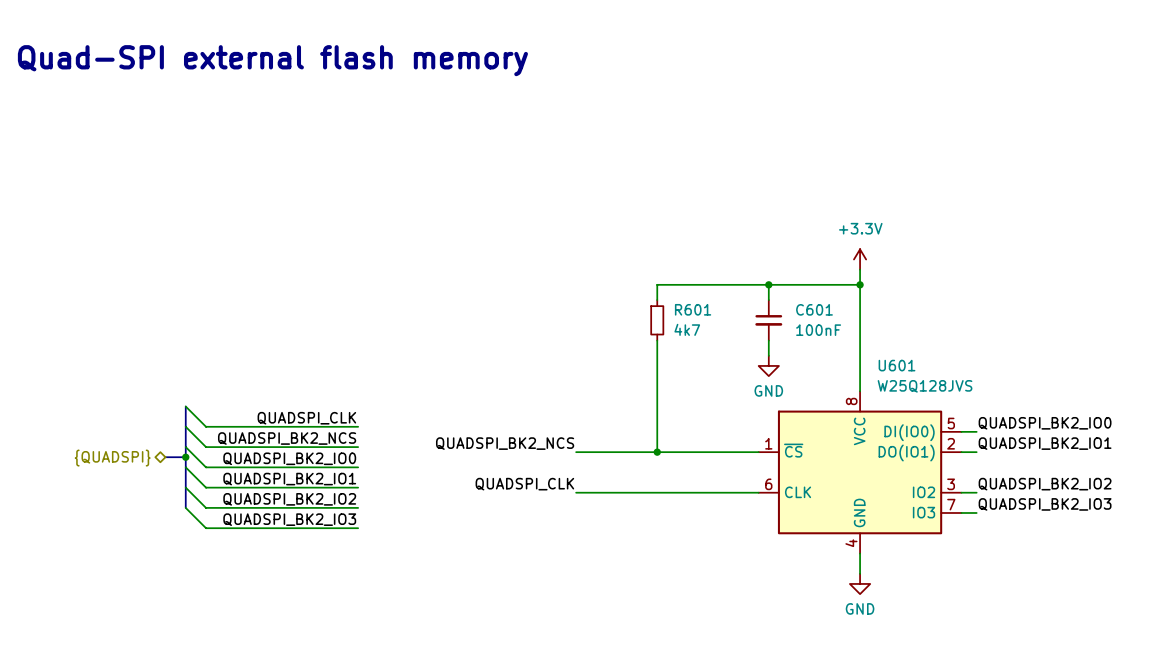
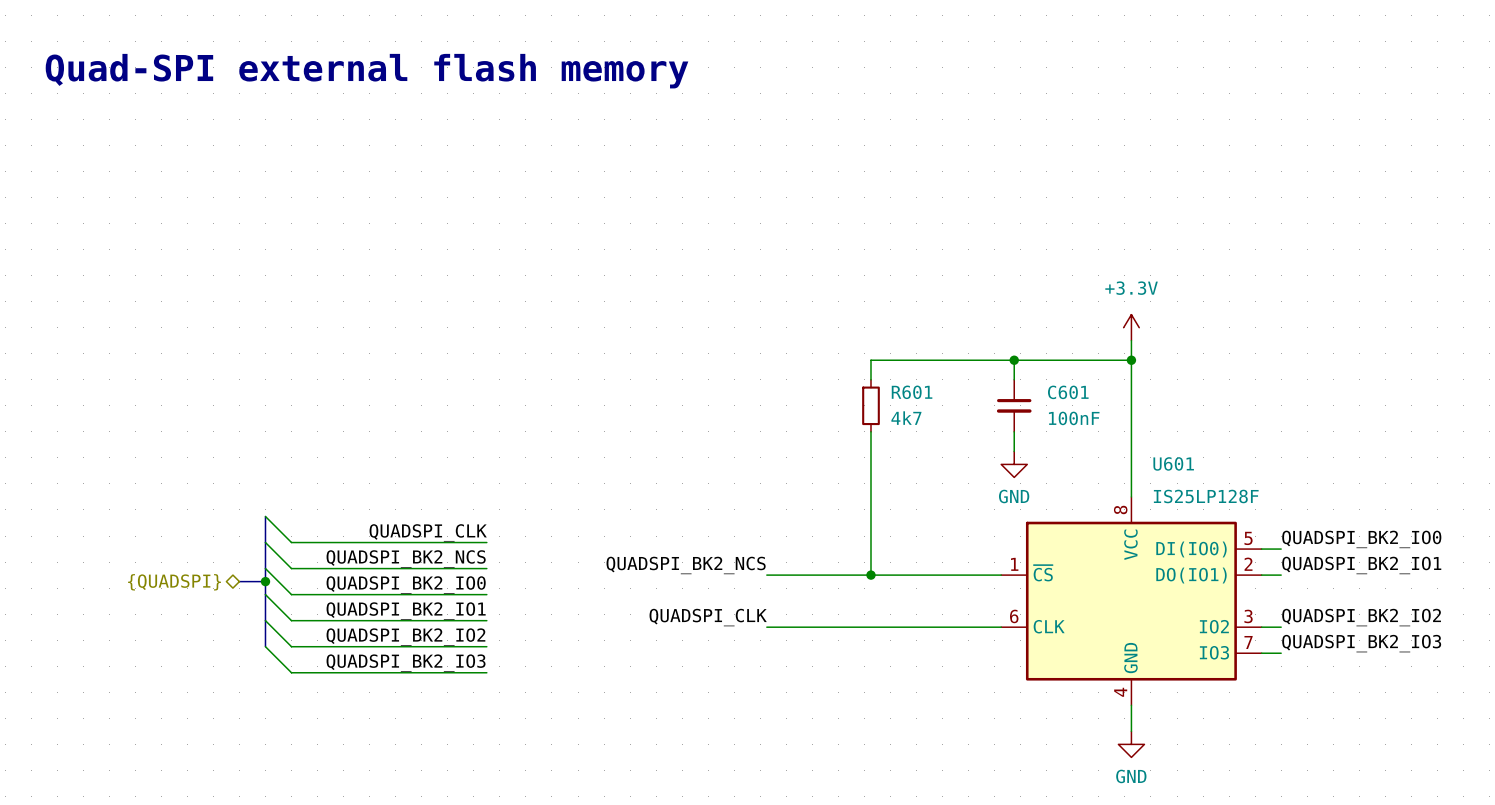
U601 value: W25Q128JVS (925, 386) -> IS25LP128F (1206, 496)

